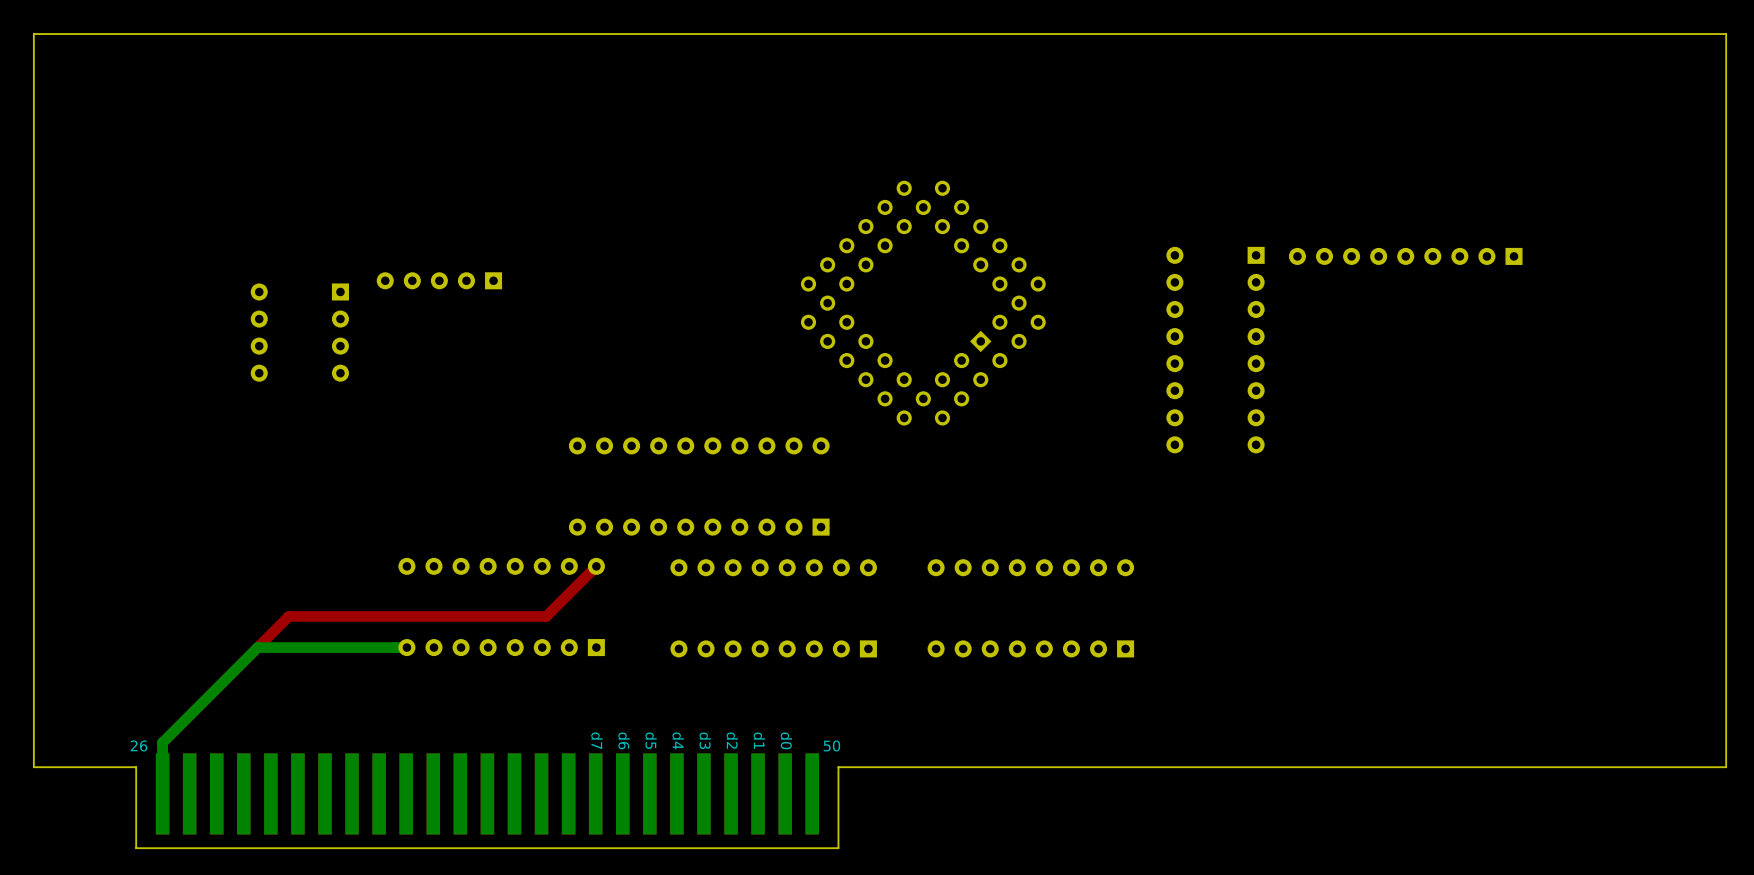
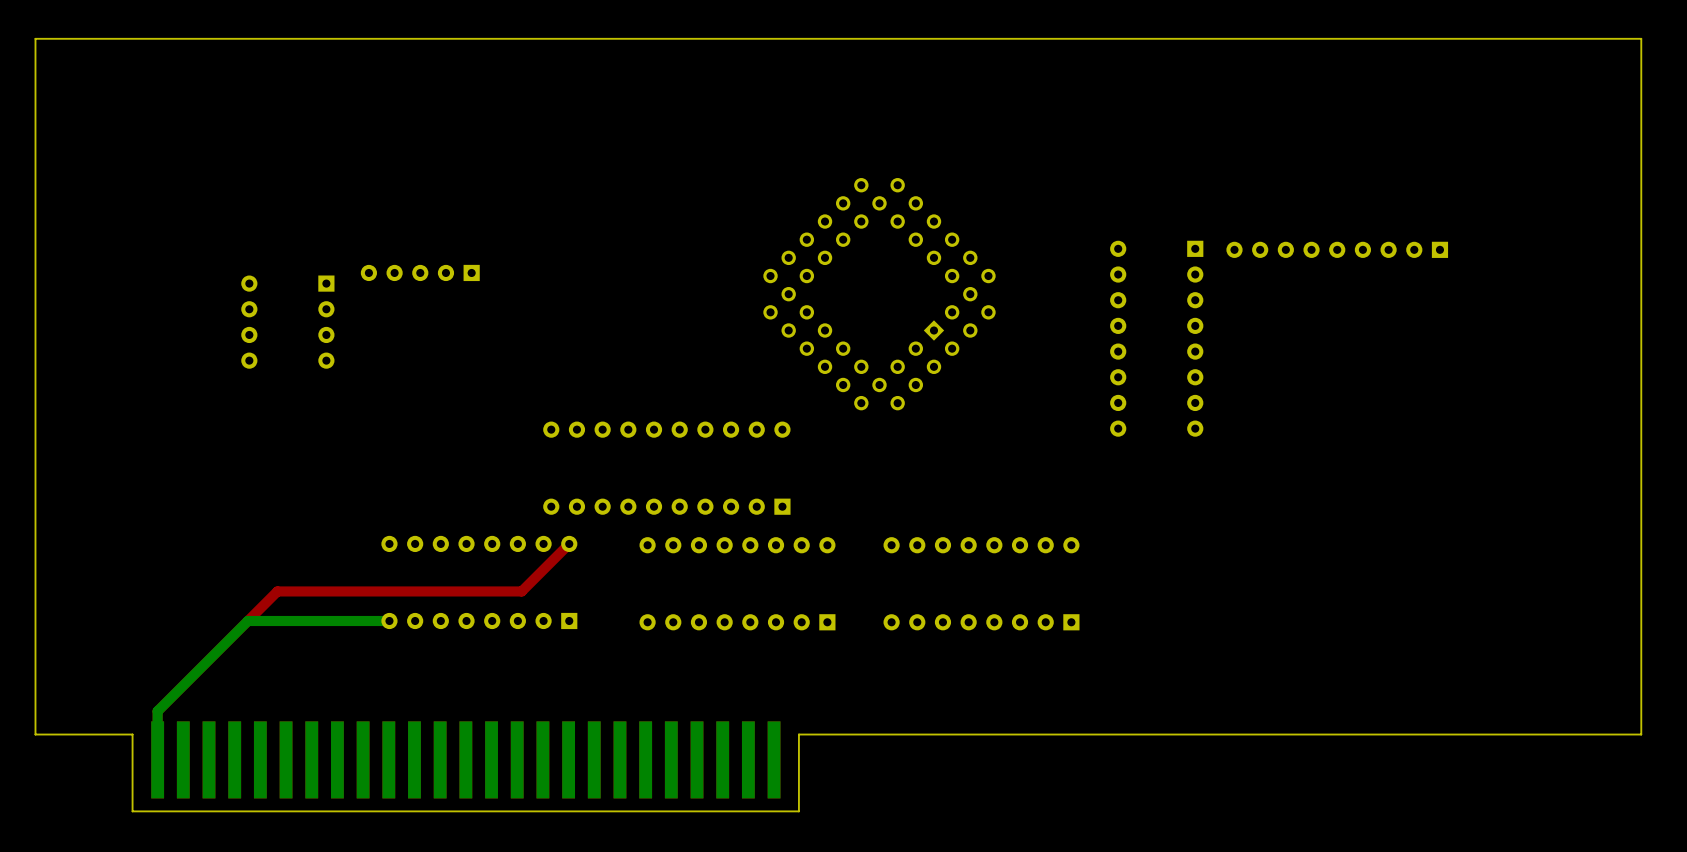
text: d7 (596, 740) -> none
text: d6 (623, 740) -> none
text: d5 (651, 740) -> none
text: d4 (678, 740) -> none
text: d3 (705, 740) -> none
text: d2 (732, 740) -> none
text: d1 (759, 740) -> none
text: d0 (786, 740) -> none
text: 26 (139, 745) -> none
text: 50 (831, 745) -> none

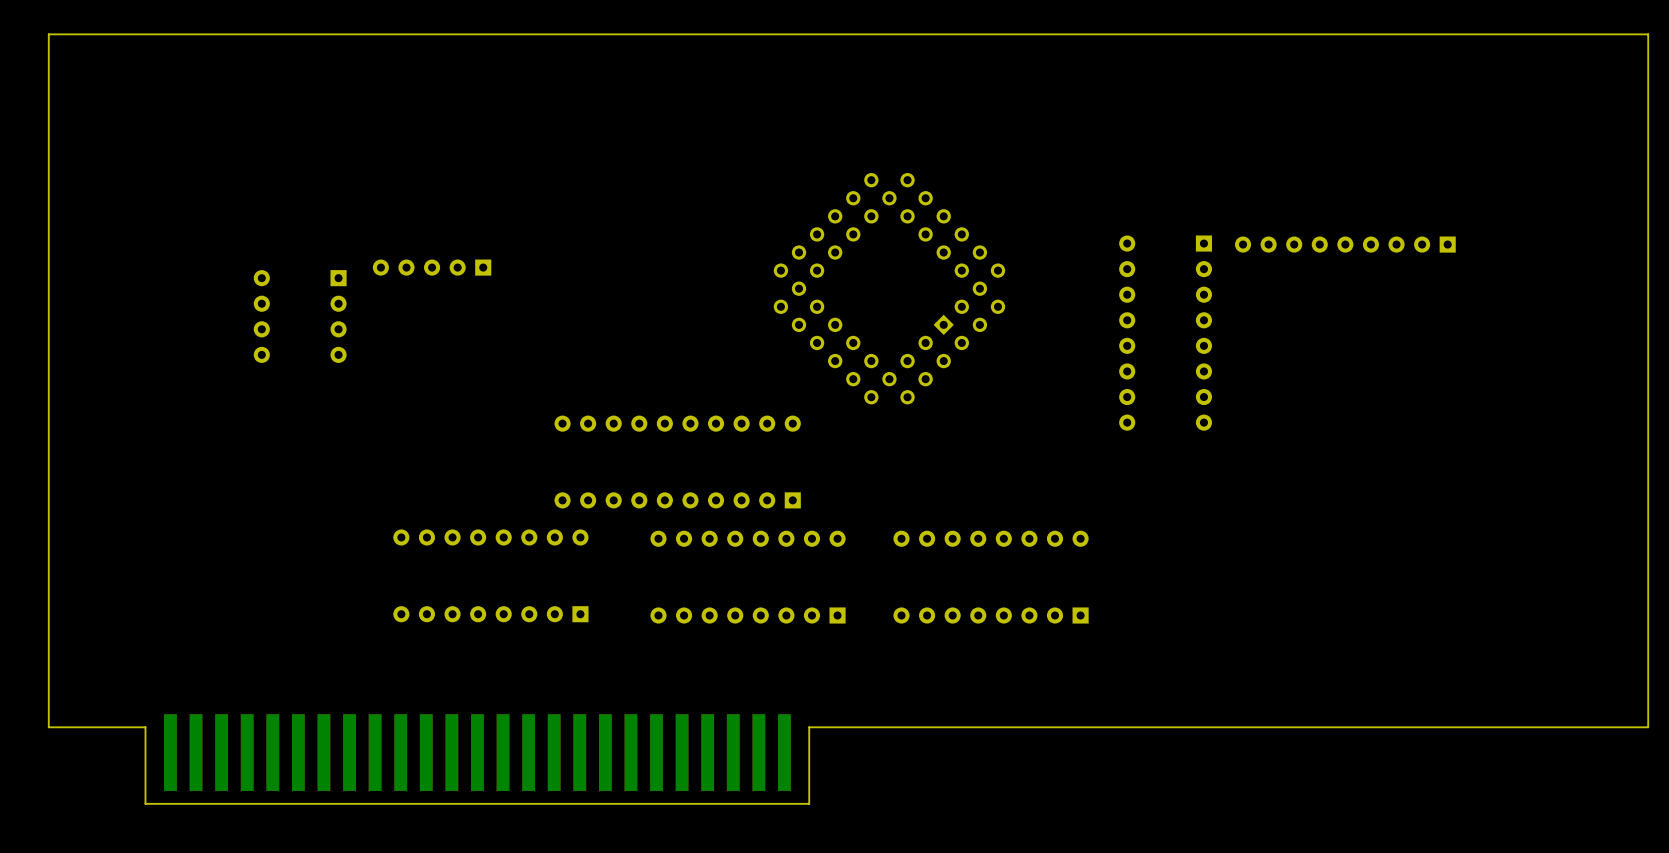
top track: (569, 543) (521, 591) (277, 591) (157, 711) (157, 759) -> none
bottom track: (389, 620) (247, 620) (157, 711) (157, 759) -> none

